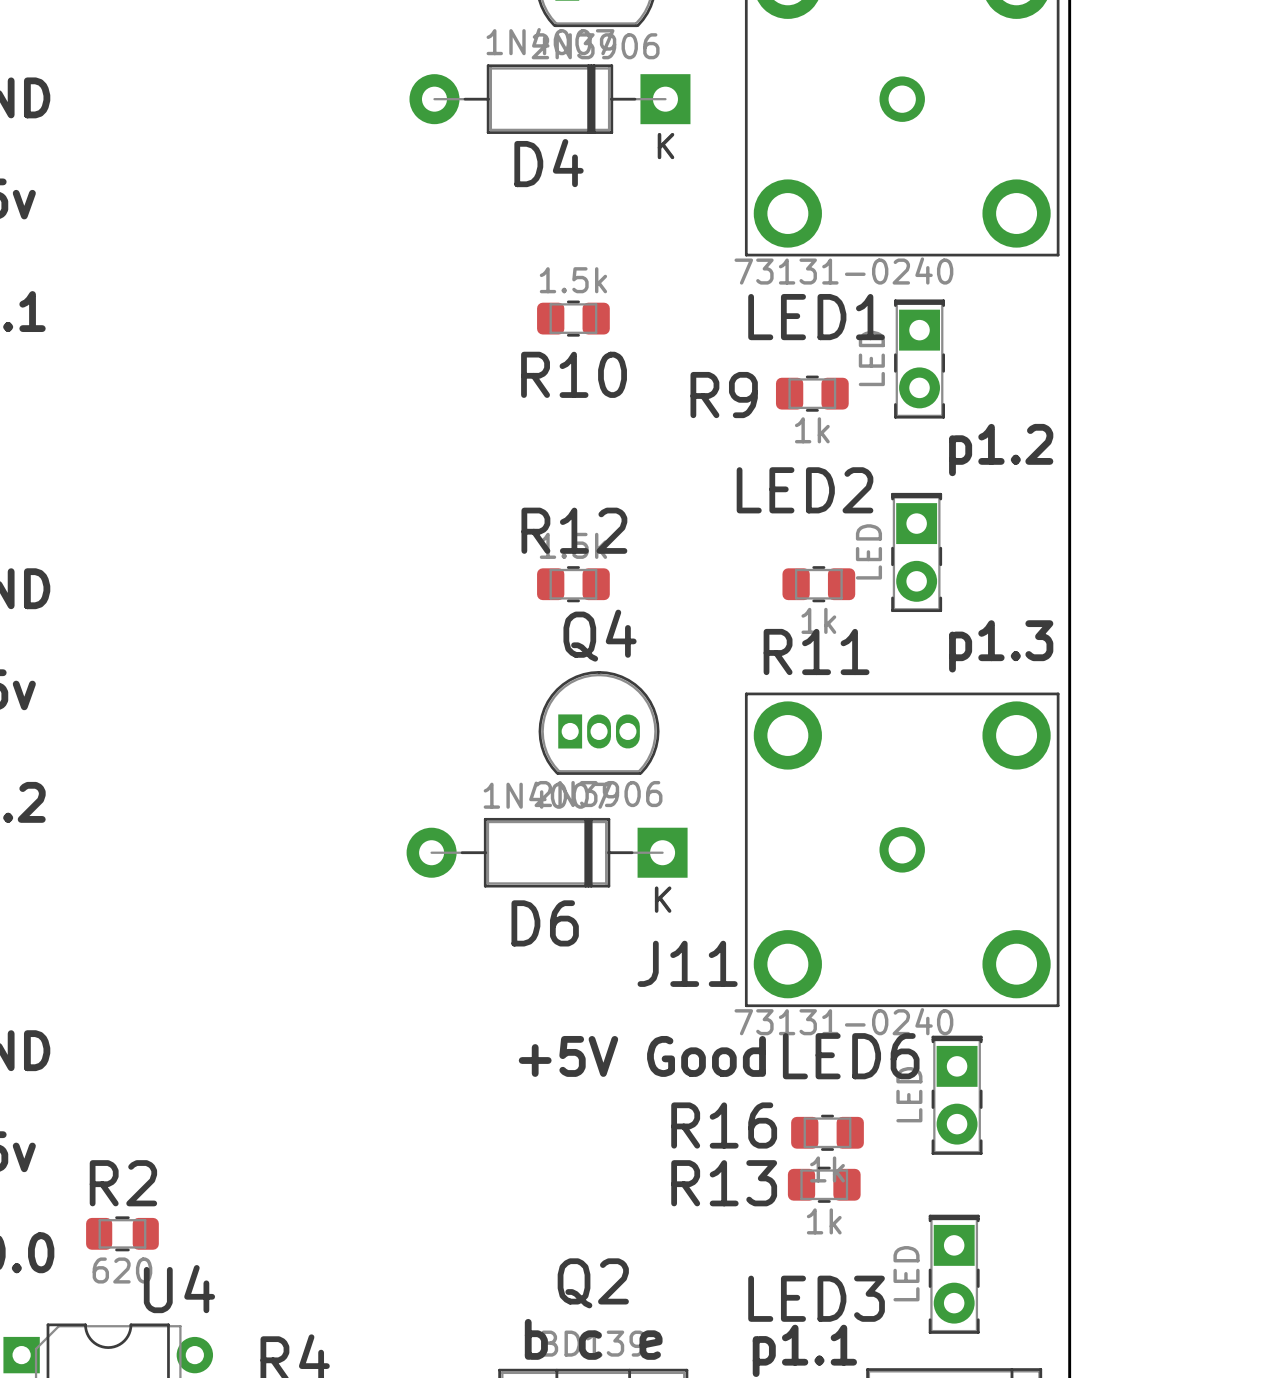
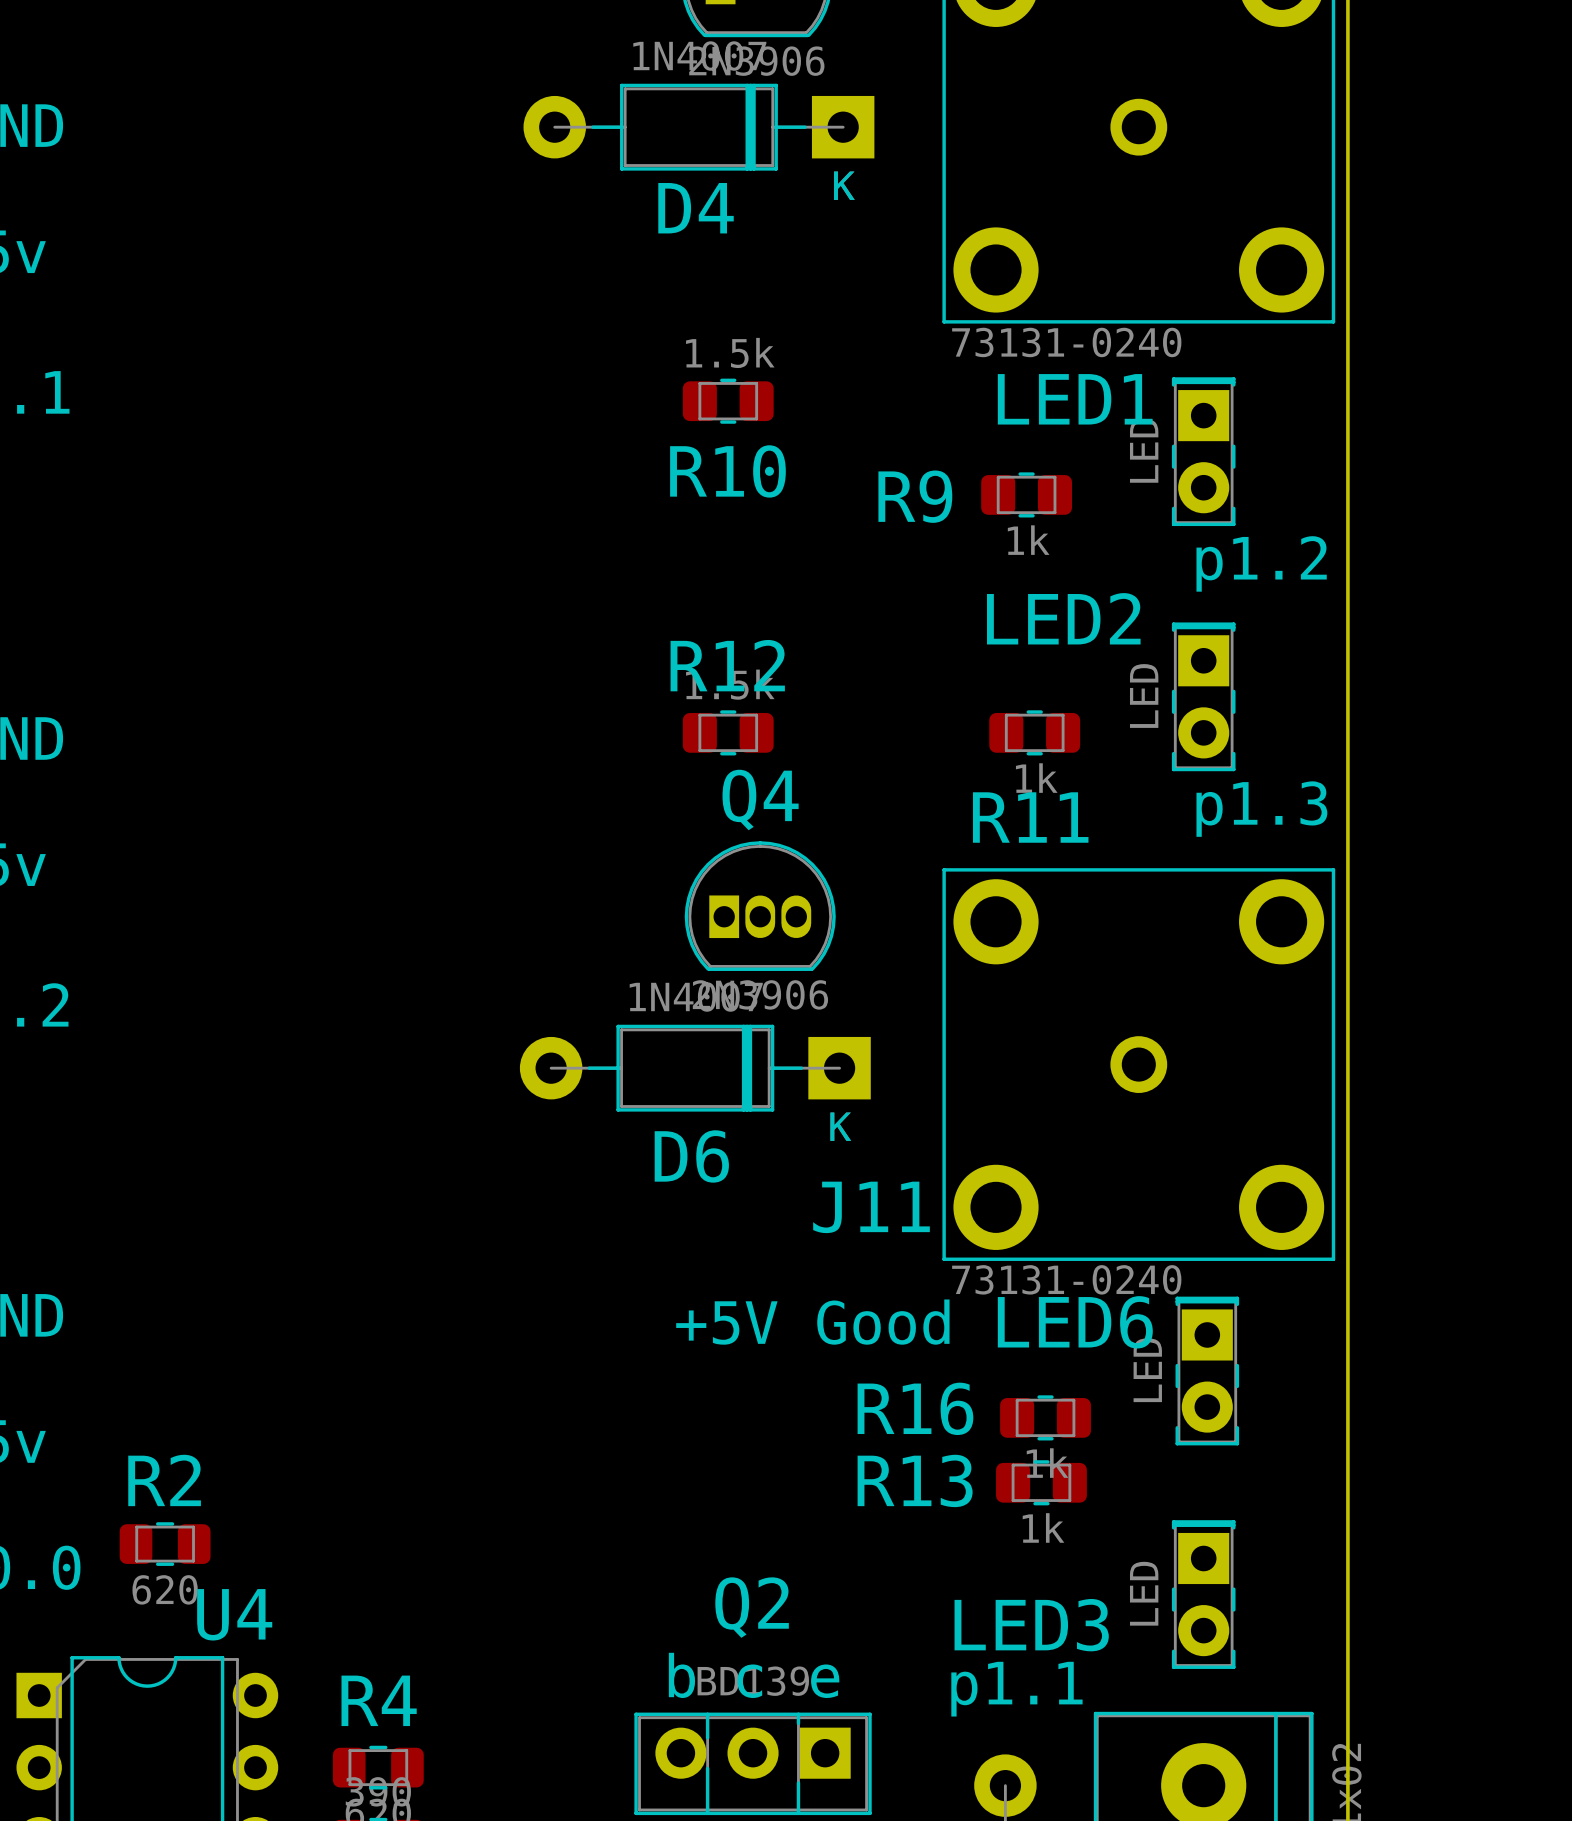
LED1 position: (919, 359) -> (1203, 451)
LED2 position: (916, 552) -> (1203, 696)

